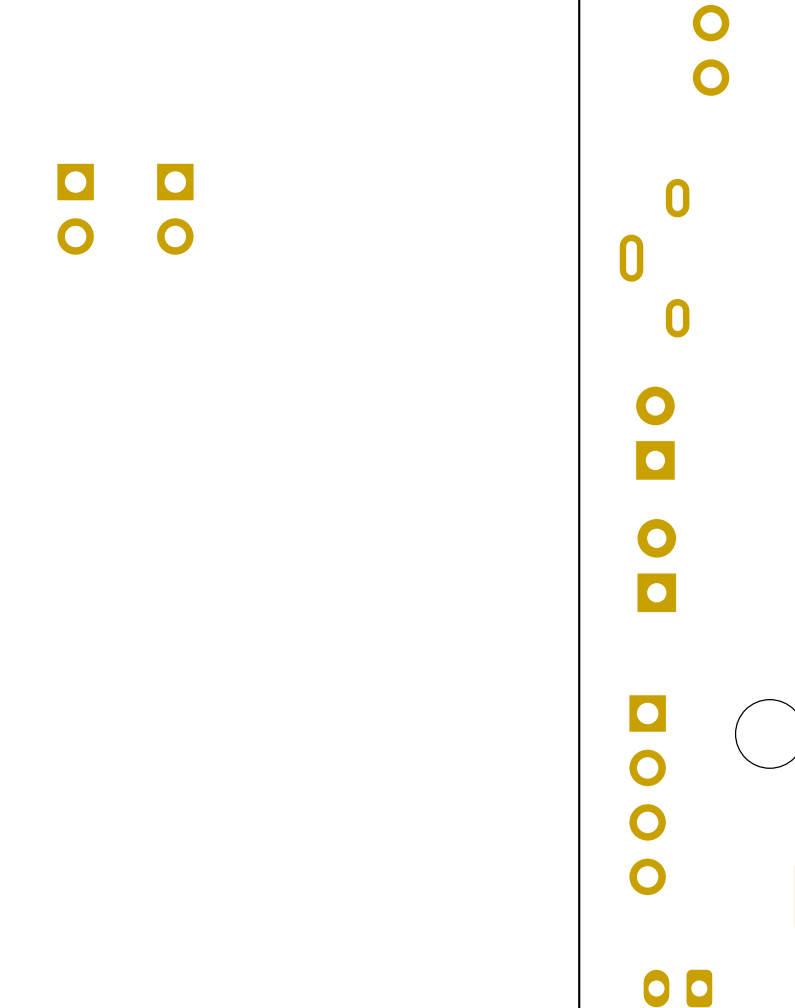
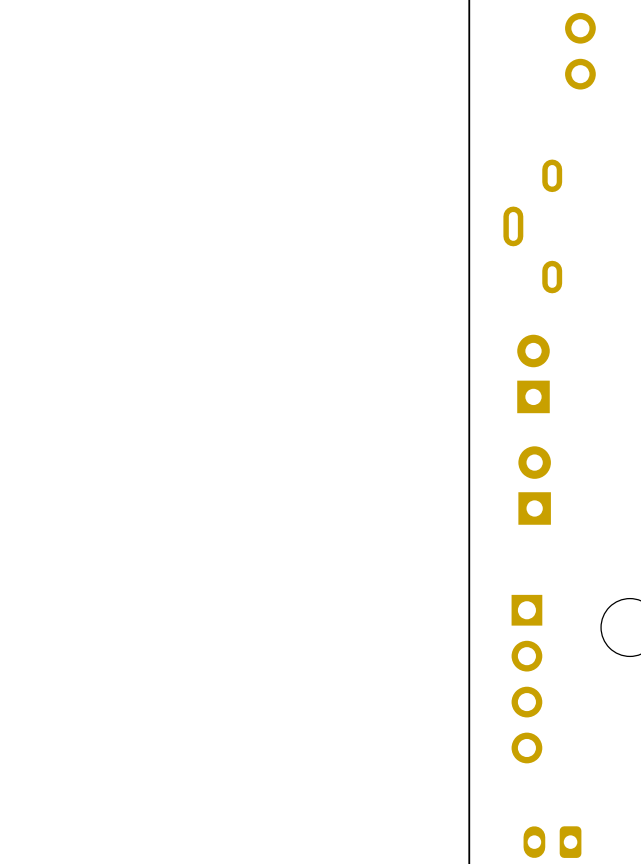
part: (75, 209) -> none
part: (175, 209) -> none

